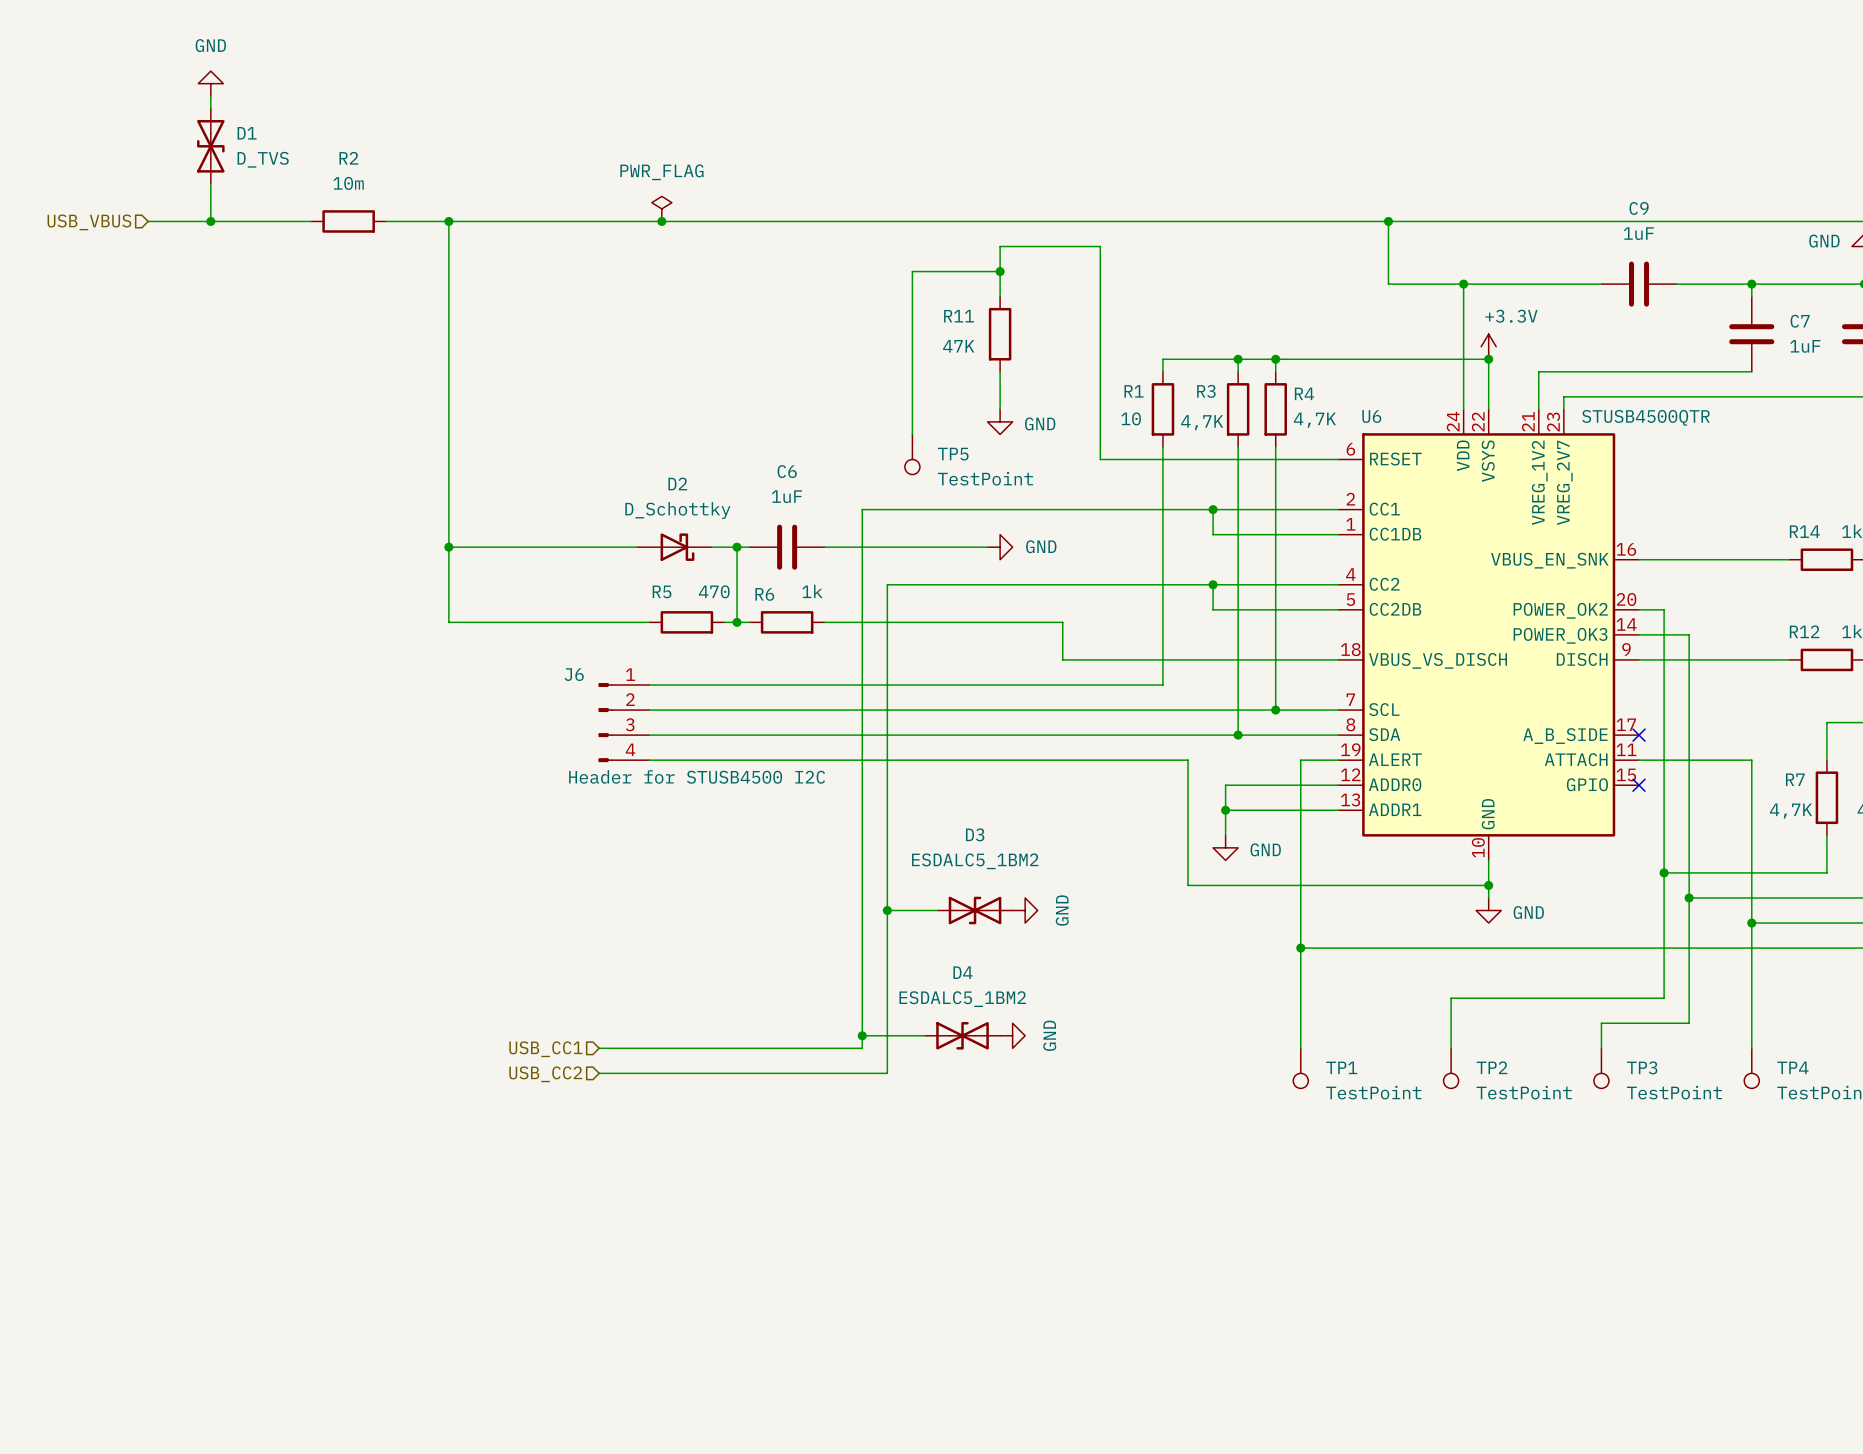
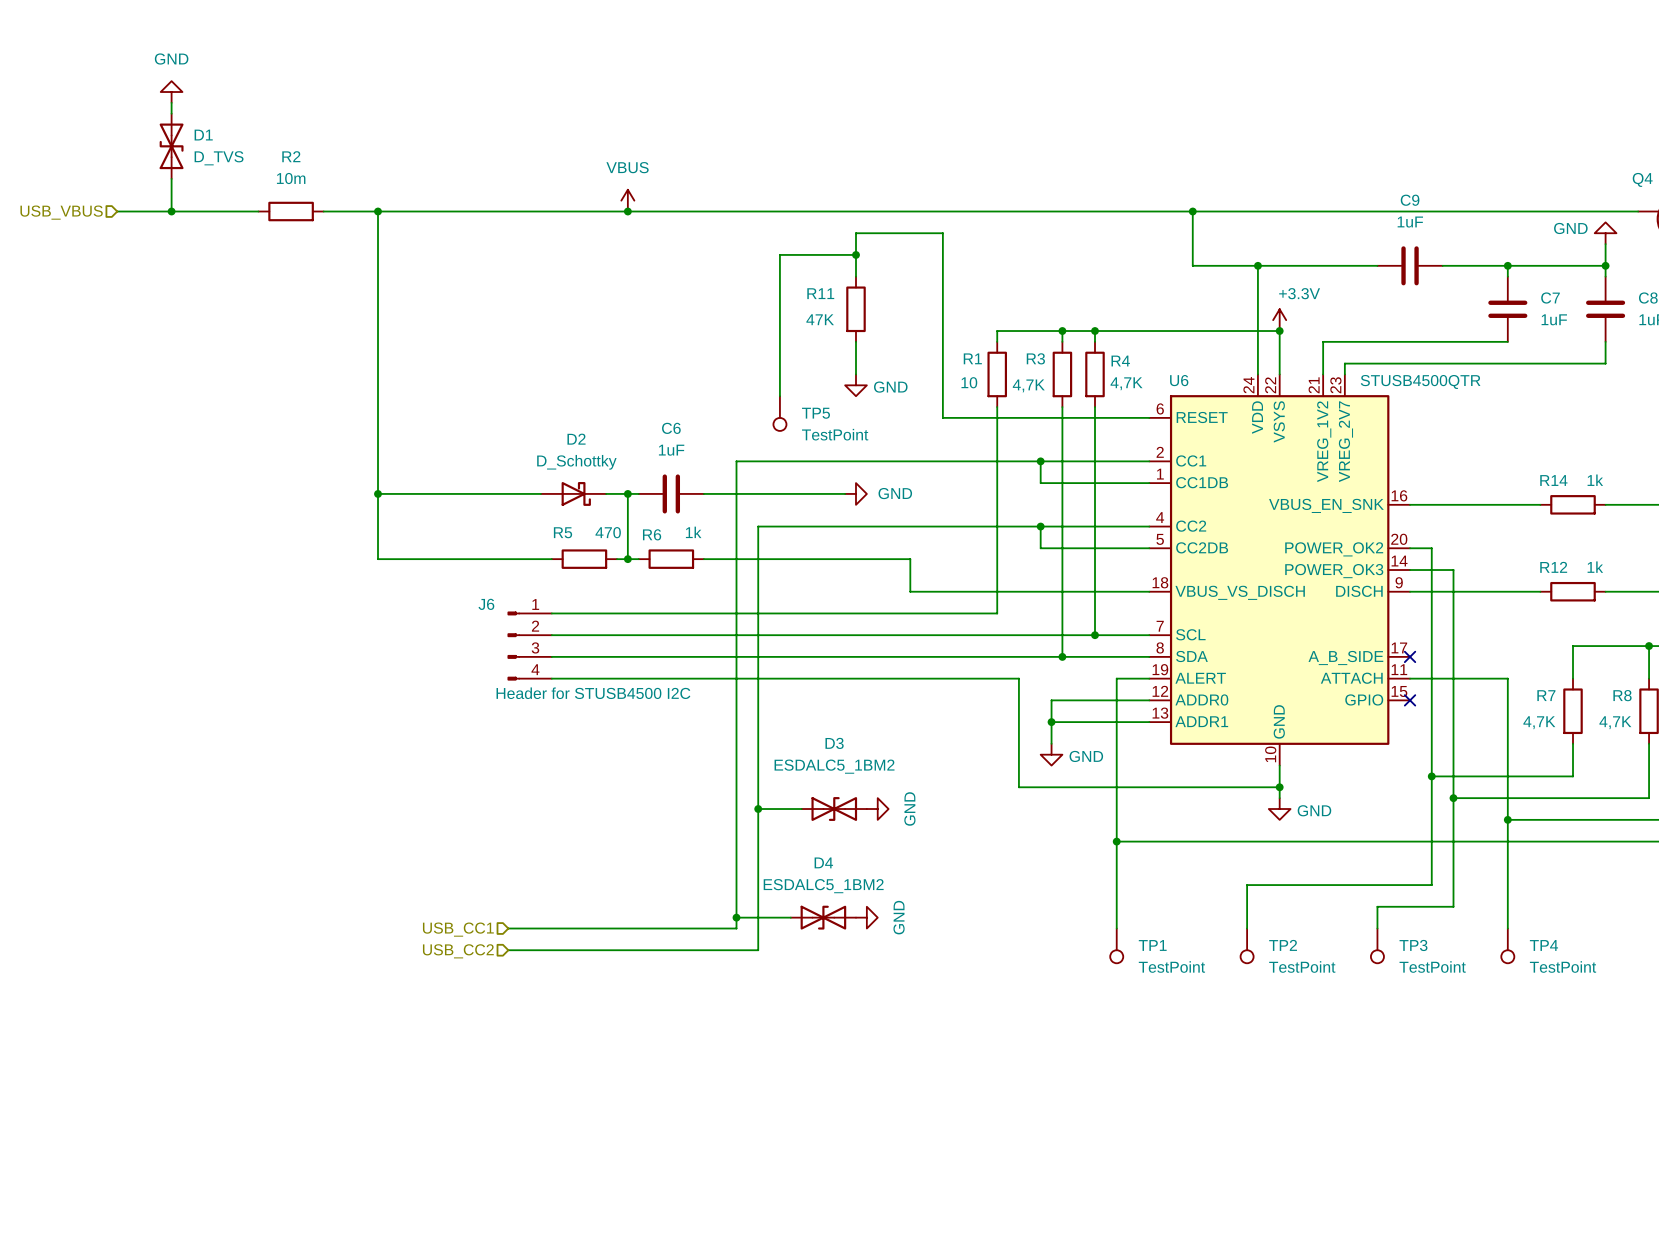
power symbol: PWR_FLAG (661, 208) -> none
power symbol: none -> VBUS (627, 200)
junction: (661, 221) -> none
junction: none -> (627, 211)

